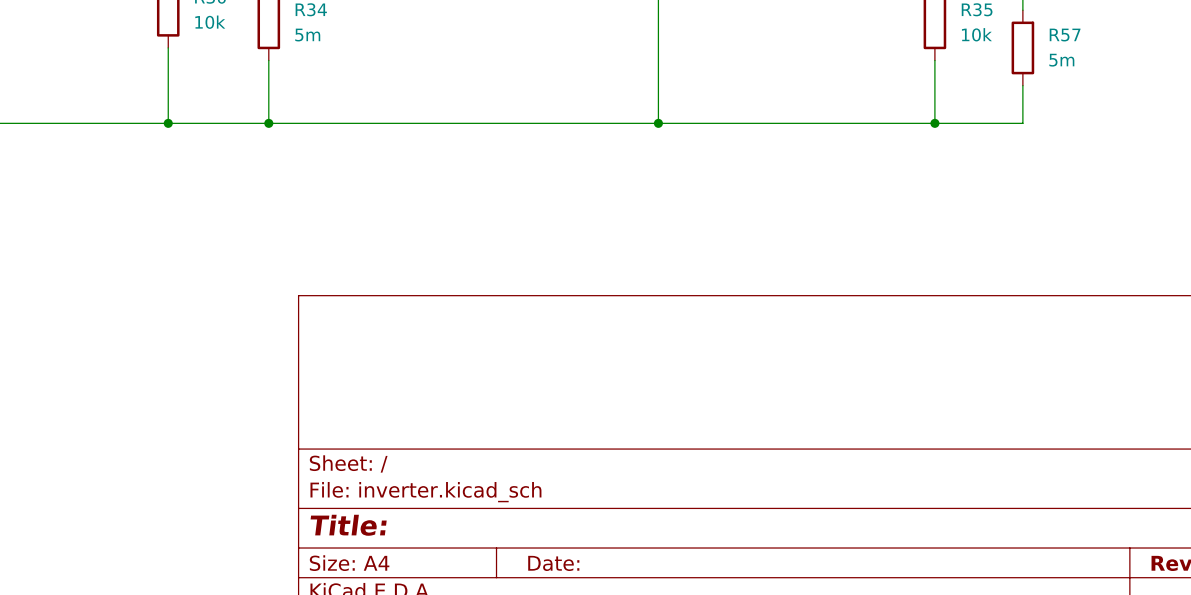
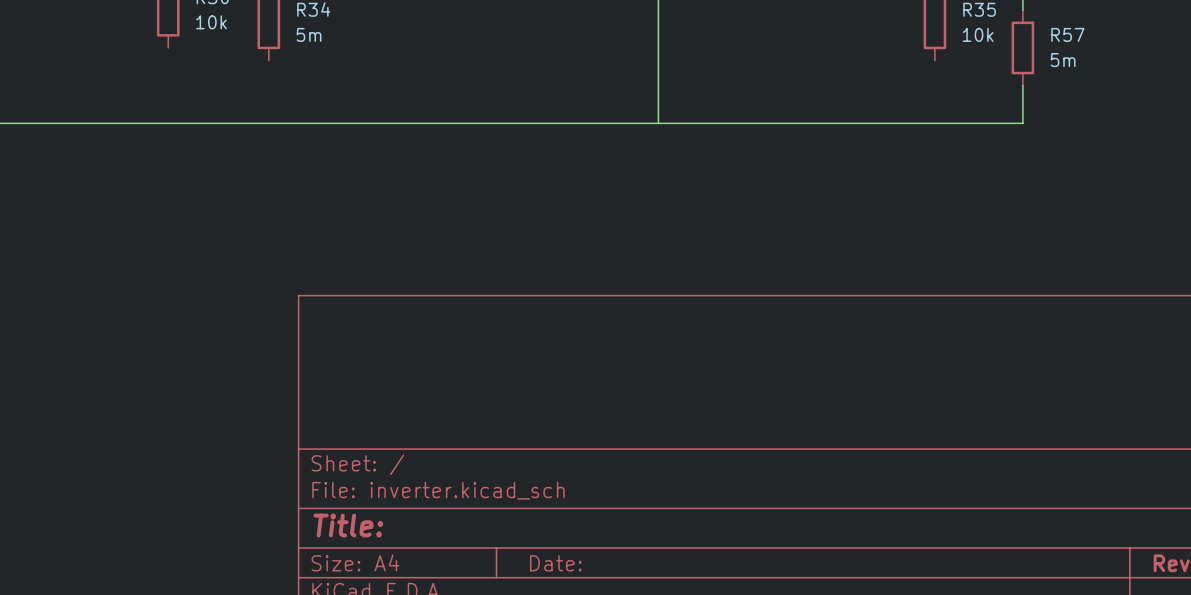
wire: (168, 47) (168, 123) -> none
wire: (268, 60) (268, 123) -> none
wire: (934, 60) (934, 123) -> none
junction: (168, 123) -> none
junction: (268, 123) -> none
junction: (658, 123) -> none
junction: (934, 123) -> none

